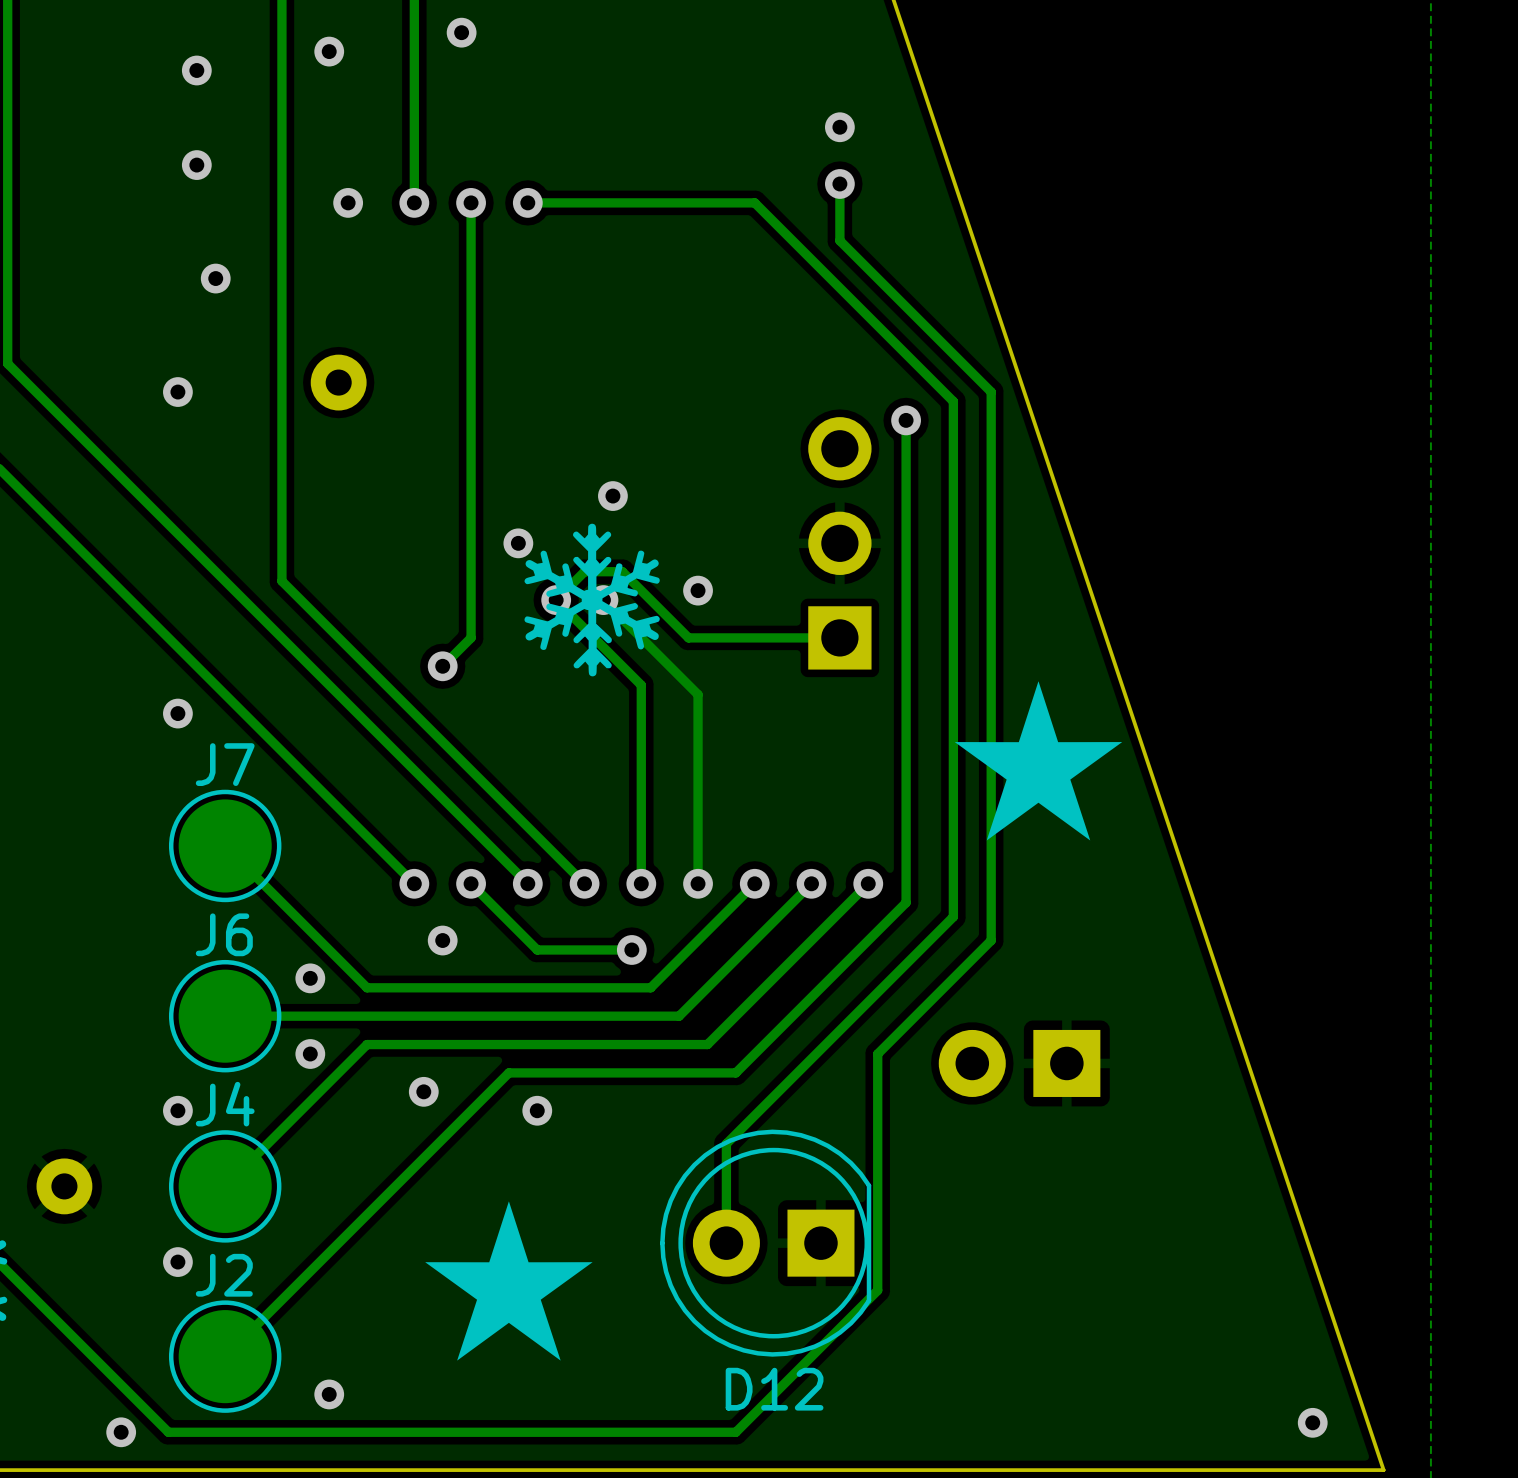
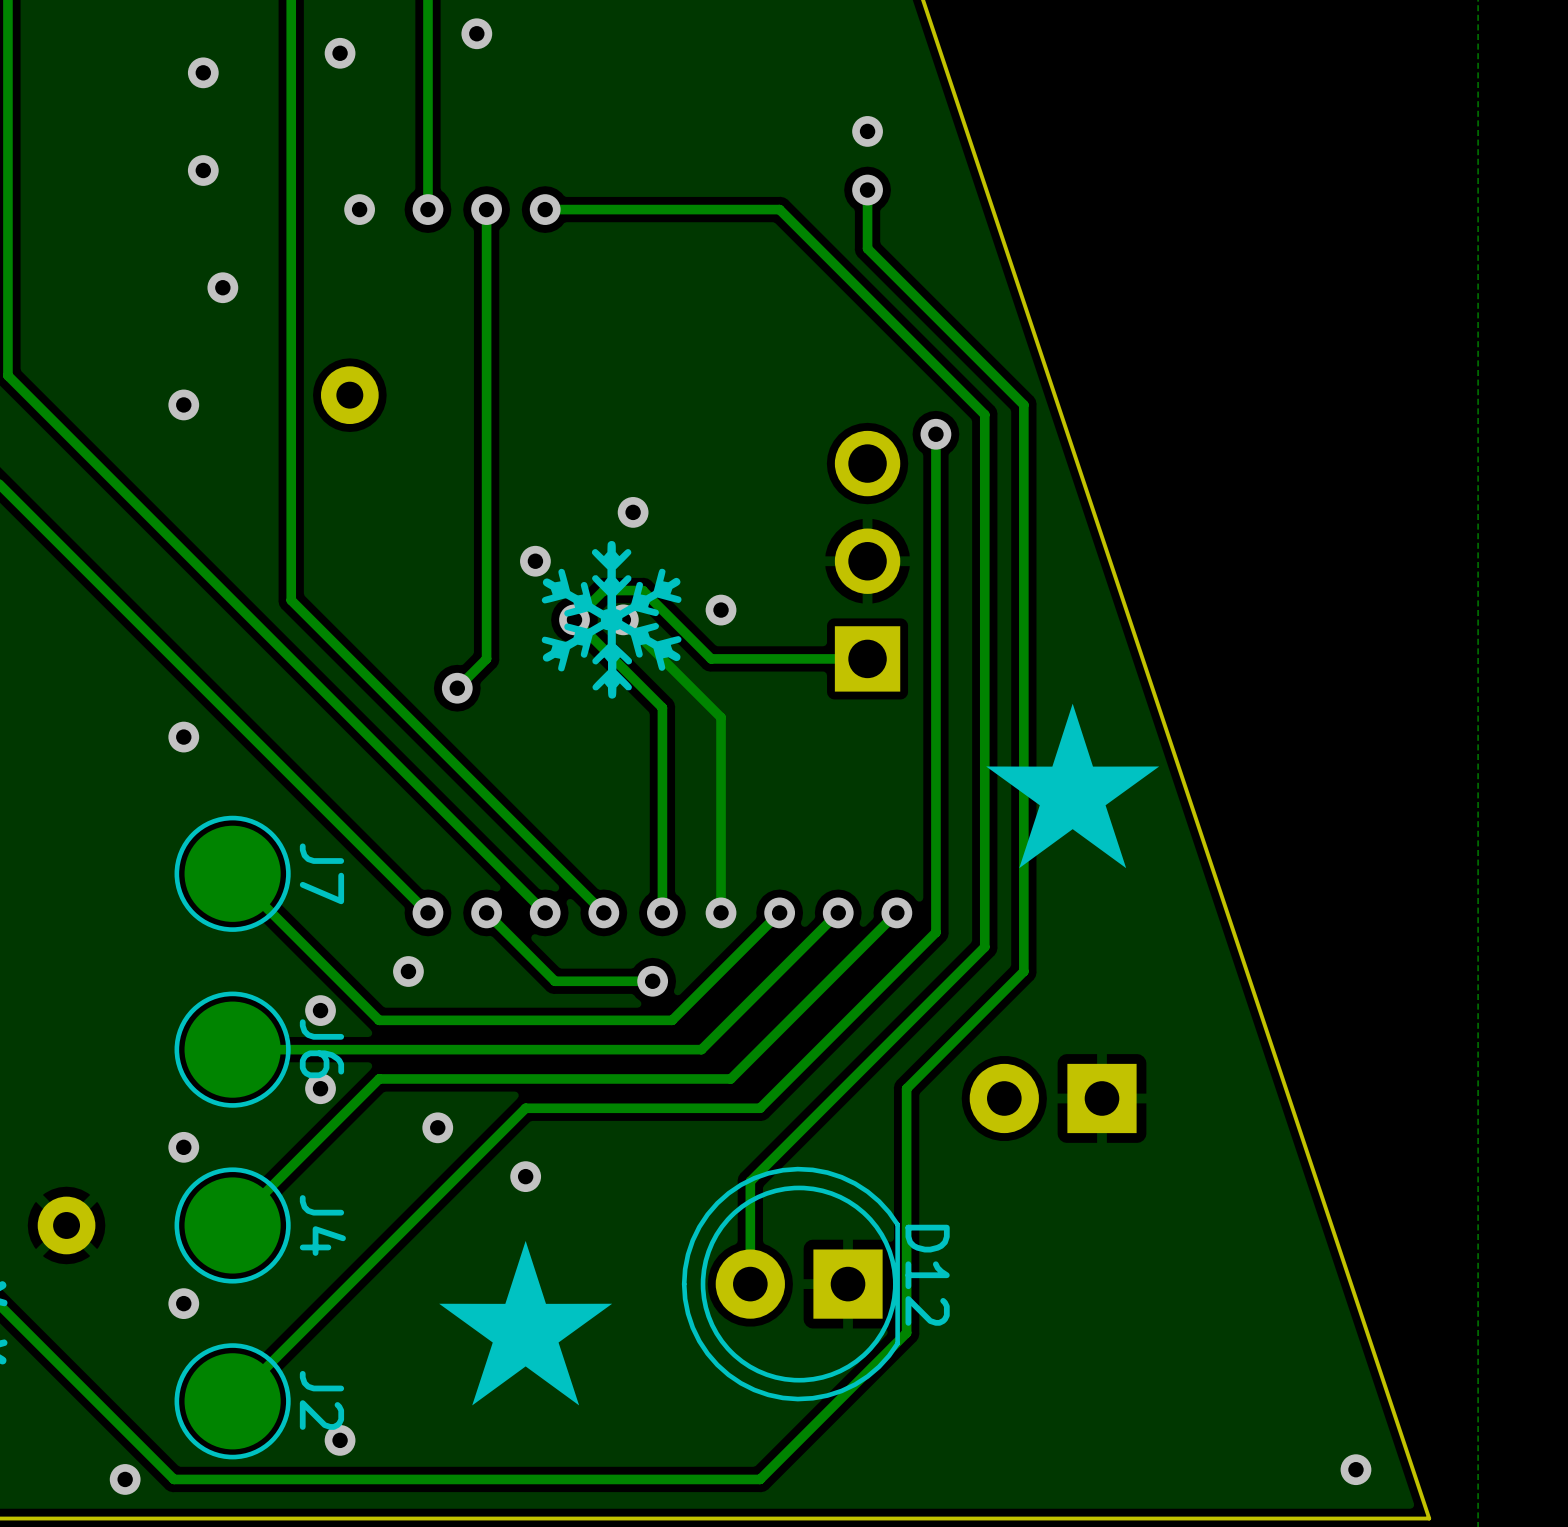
J7 name rotation: 0° (225, 764) -> 90° clockwise (321, 873)
J7 name position: J7 (225, 764) -> J7 (321, 873)
J6 name rotation: 0° (224, 934) -> 90° clockwise (321, 1048)
J6 name position: J6 (224, 934) -> J6 (321, 1048)
via position: (442, 940) -> (408, 971)
J4 name rotation: 0° (225, 1104) -> 90° clockwise (322, 1225)
J4 name position: J4 (225, 1104) -> J4 (322, 1225)
via position: (537, 1110) -> (525, 1176)
J2 name rotation: 0° (224, 1275) -> 90° clockwise (321, 1400)
J2 name position: J2 (224, 1275) -> J2 (321, 1400)
D12 name rotation: 0° (774, 1389) -> 90° clockwise (927, 1275)
D12 name position: D12 (774, 1389) -> D12 (927, 1275)

